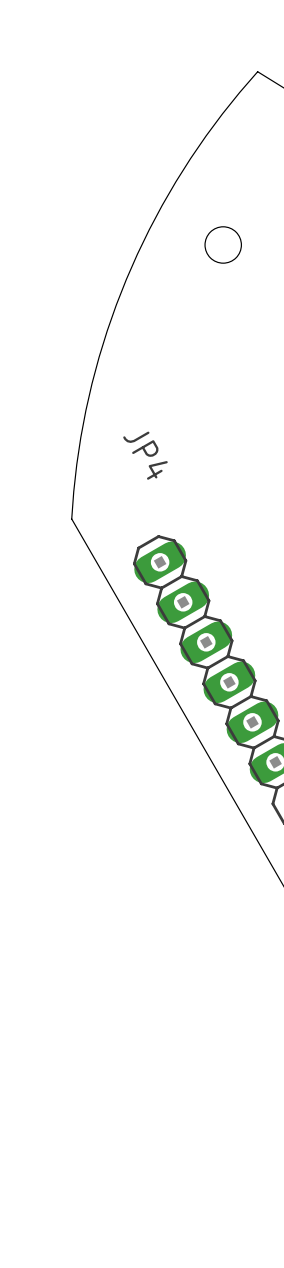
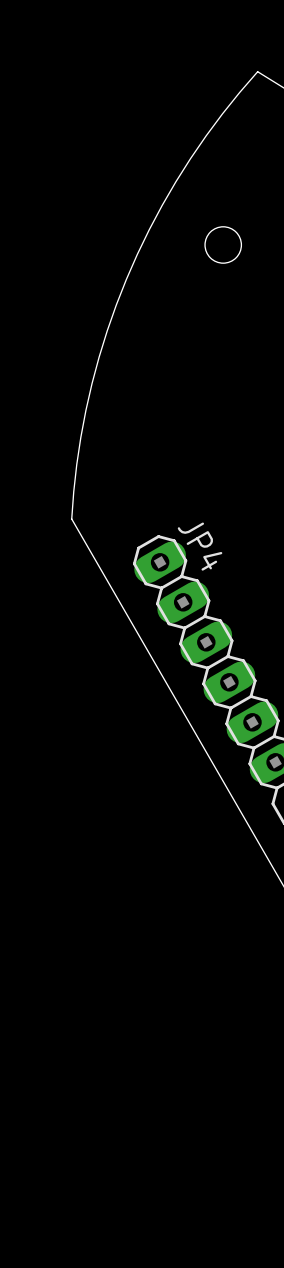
JP4 name position: JP4 (145, 455) -> JP4 (200, 546)

